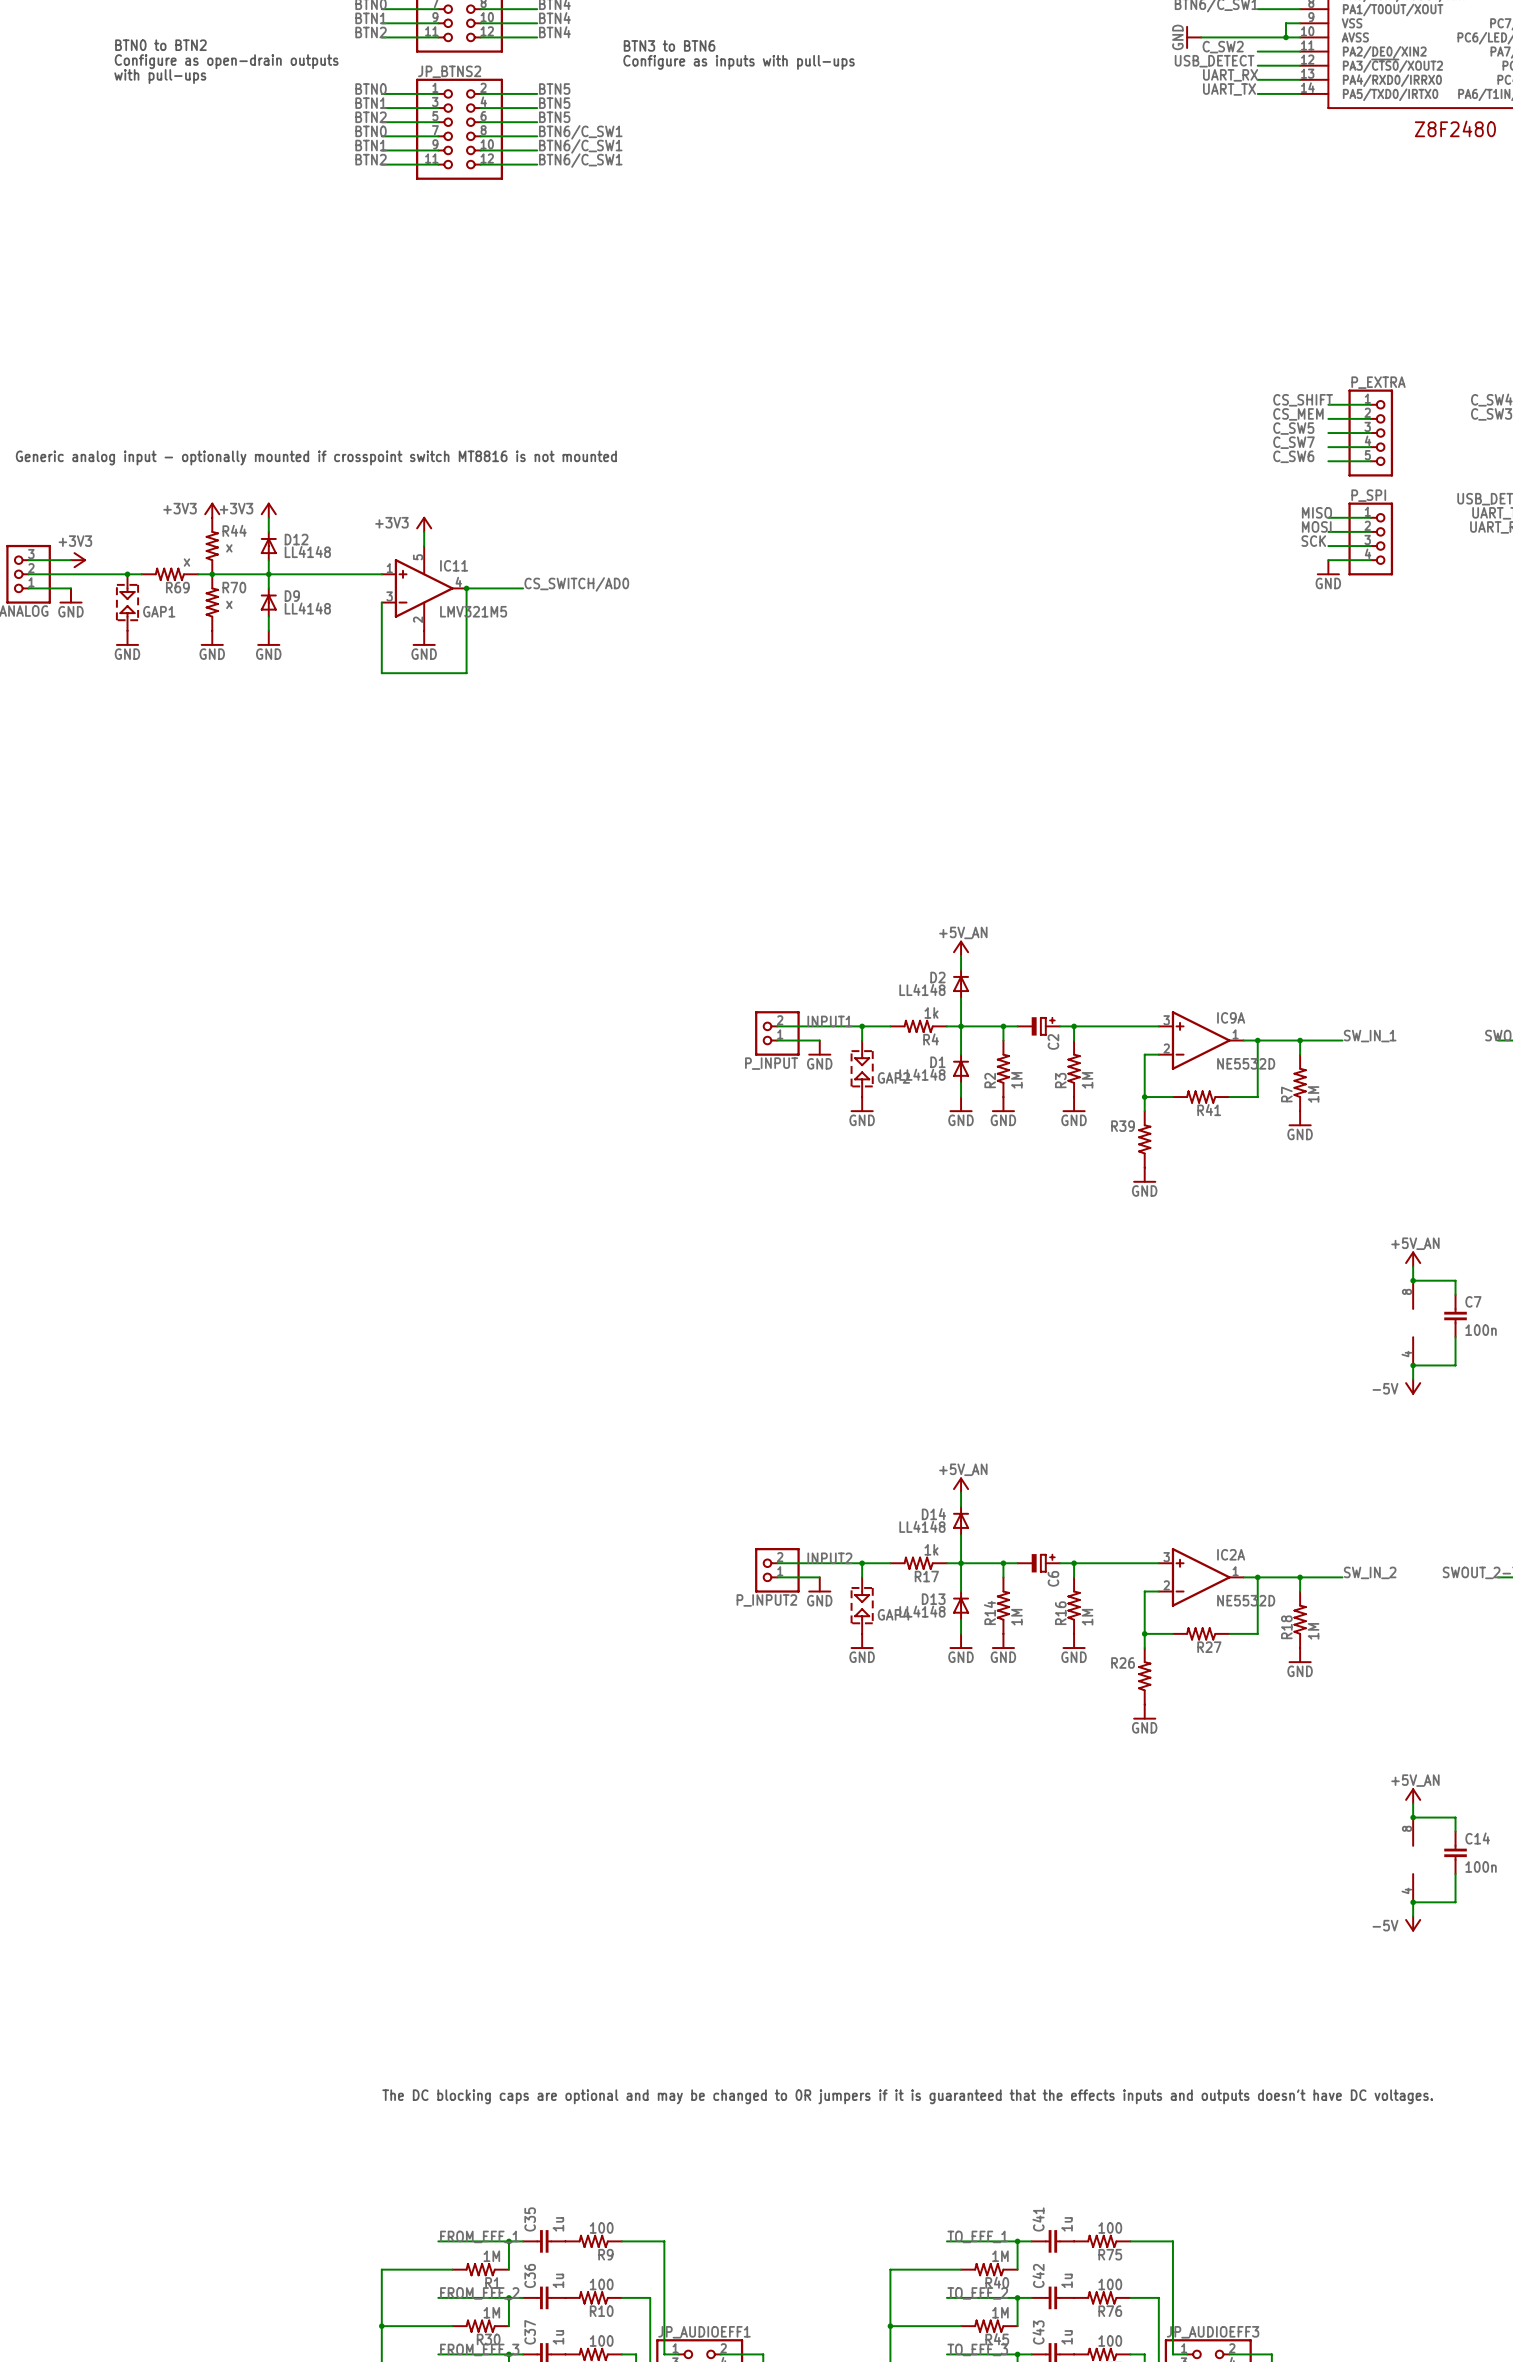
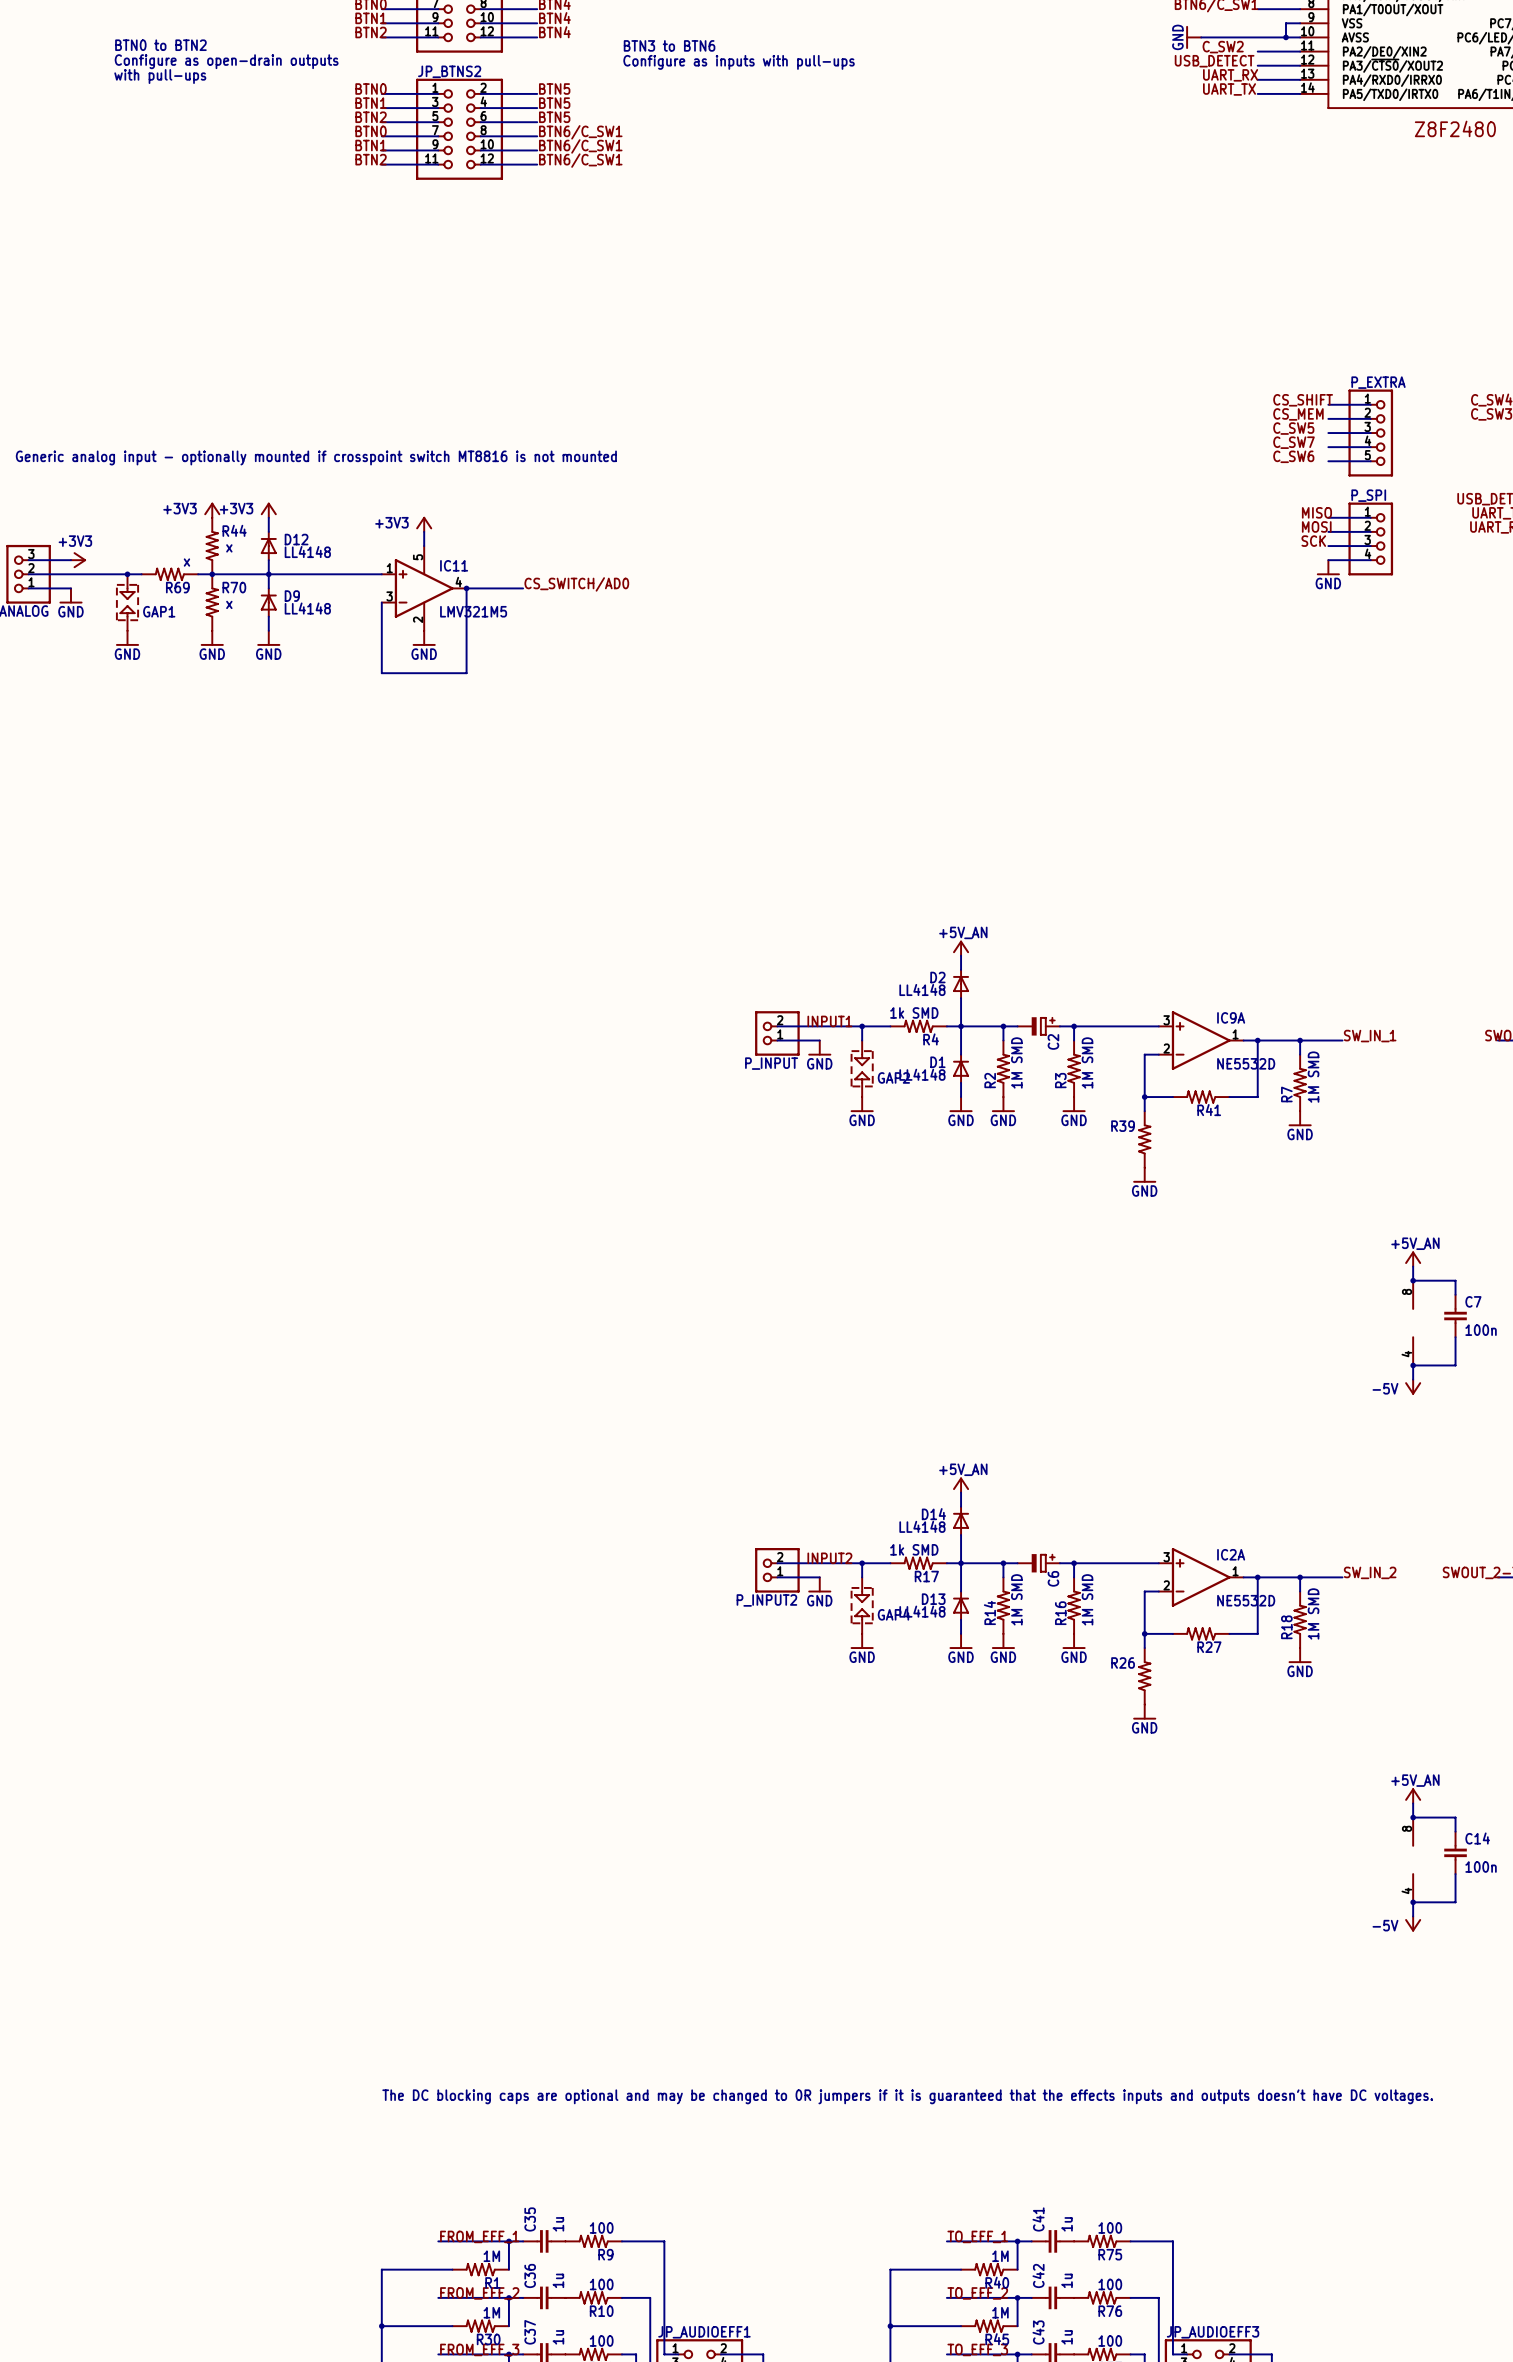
R4 value: 1k (931, 1012) -> 1k SMD (914, 1012)
R2 value: 1M (1016, 1080) -> 1M SMD (1016, 1062)
R3 value: 1M (1087, 1080) -> 1M SMD (1087, 1062)
R7 value: 1M (1313, 1094) -> 1M SMD (1313, 1077)
R17 value: 1k (931, 1549) -> 1k SMD (914, 1549)
R14 value: 1M (1016, 1617) -> 1M SMD (1016, 1599)
R16 value: 1M (1087, 1617) -> 1M SMD (1087, 1599)
R18 value: 1M (1313, 1631) -> 1M SMD (1313, 1613)

